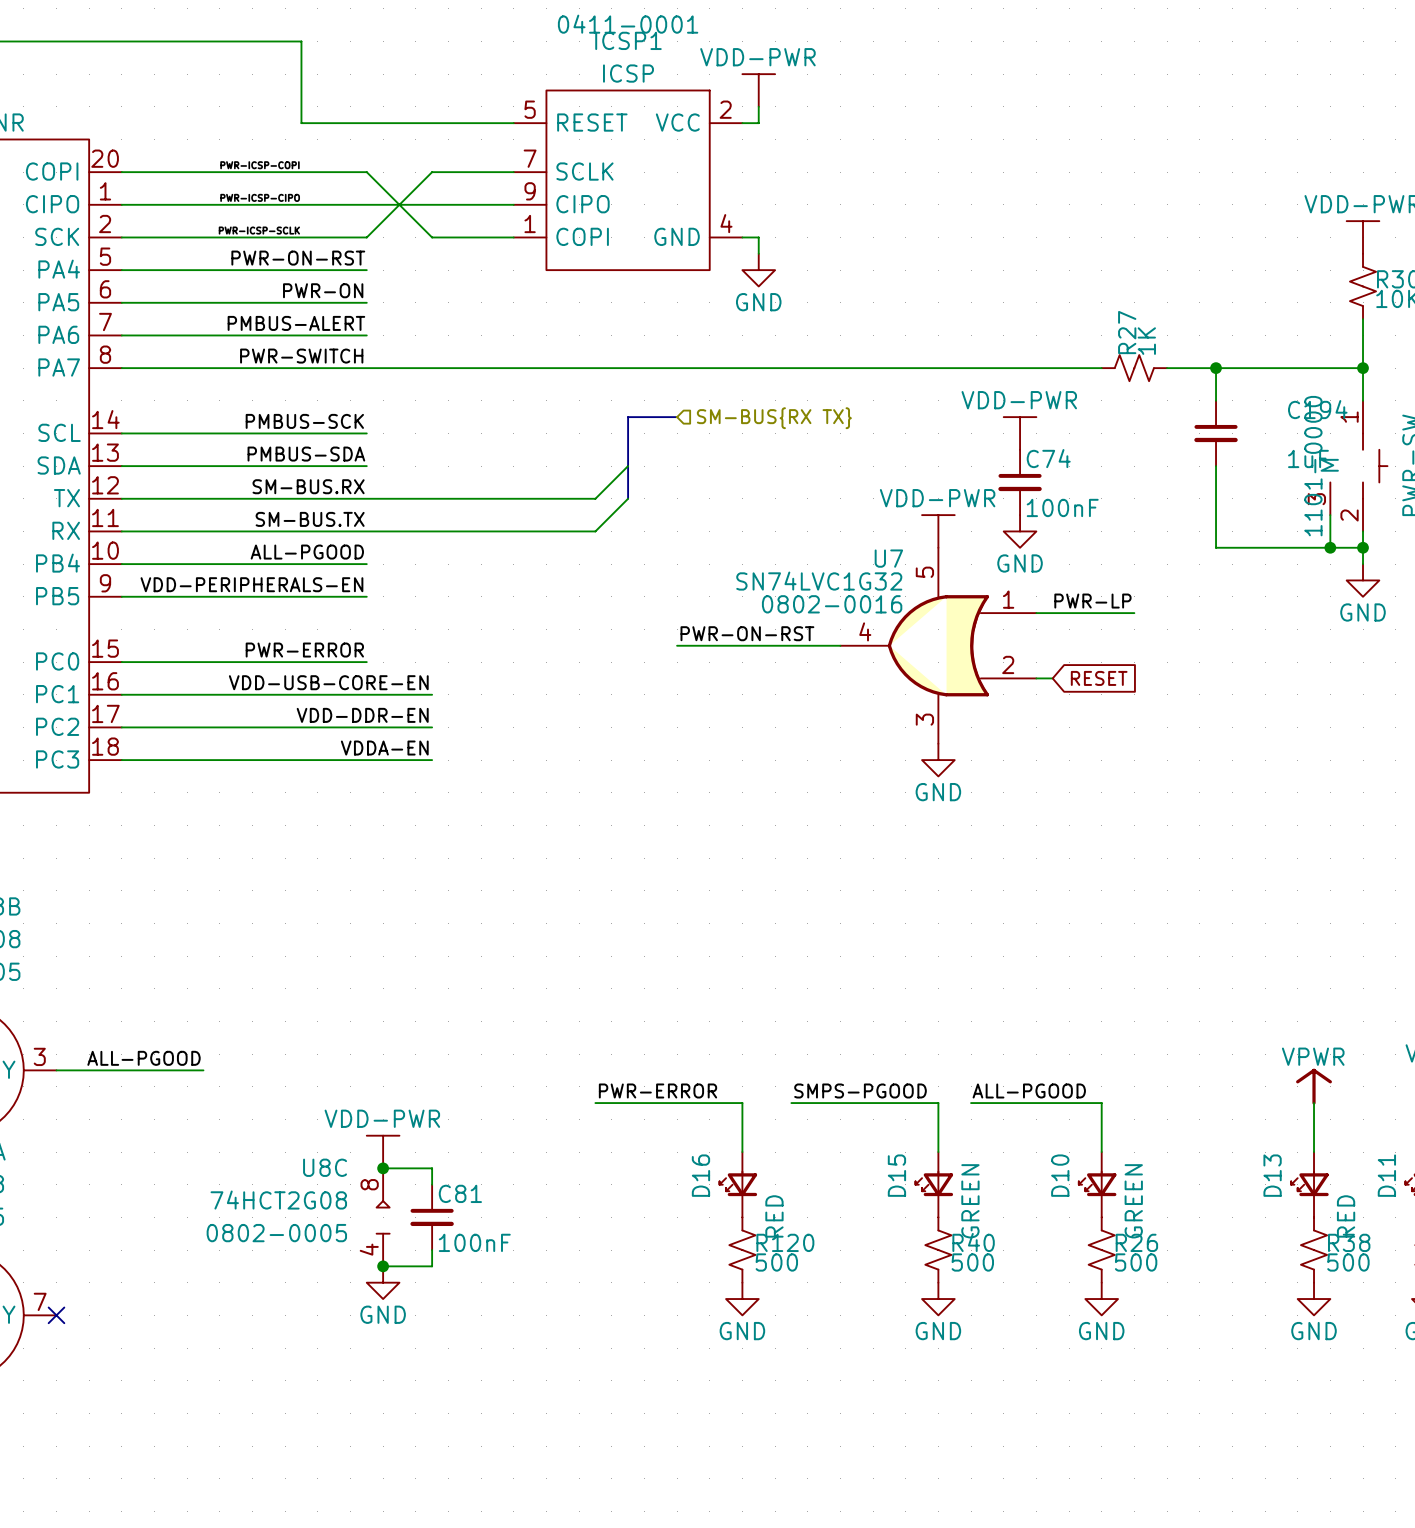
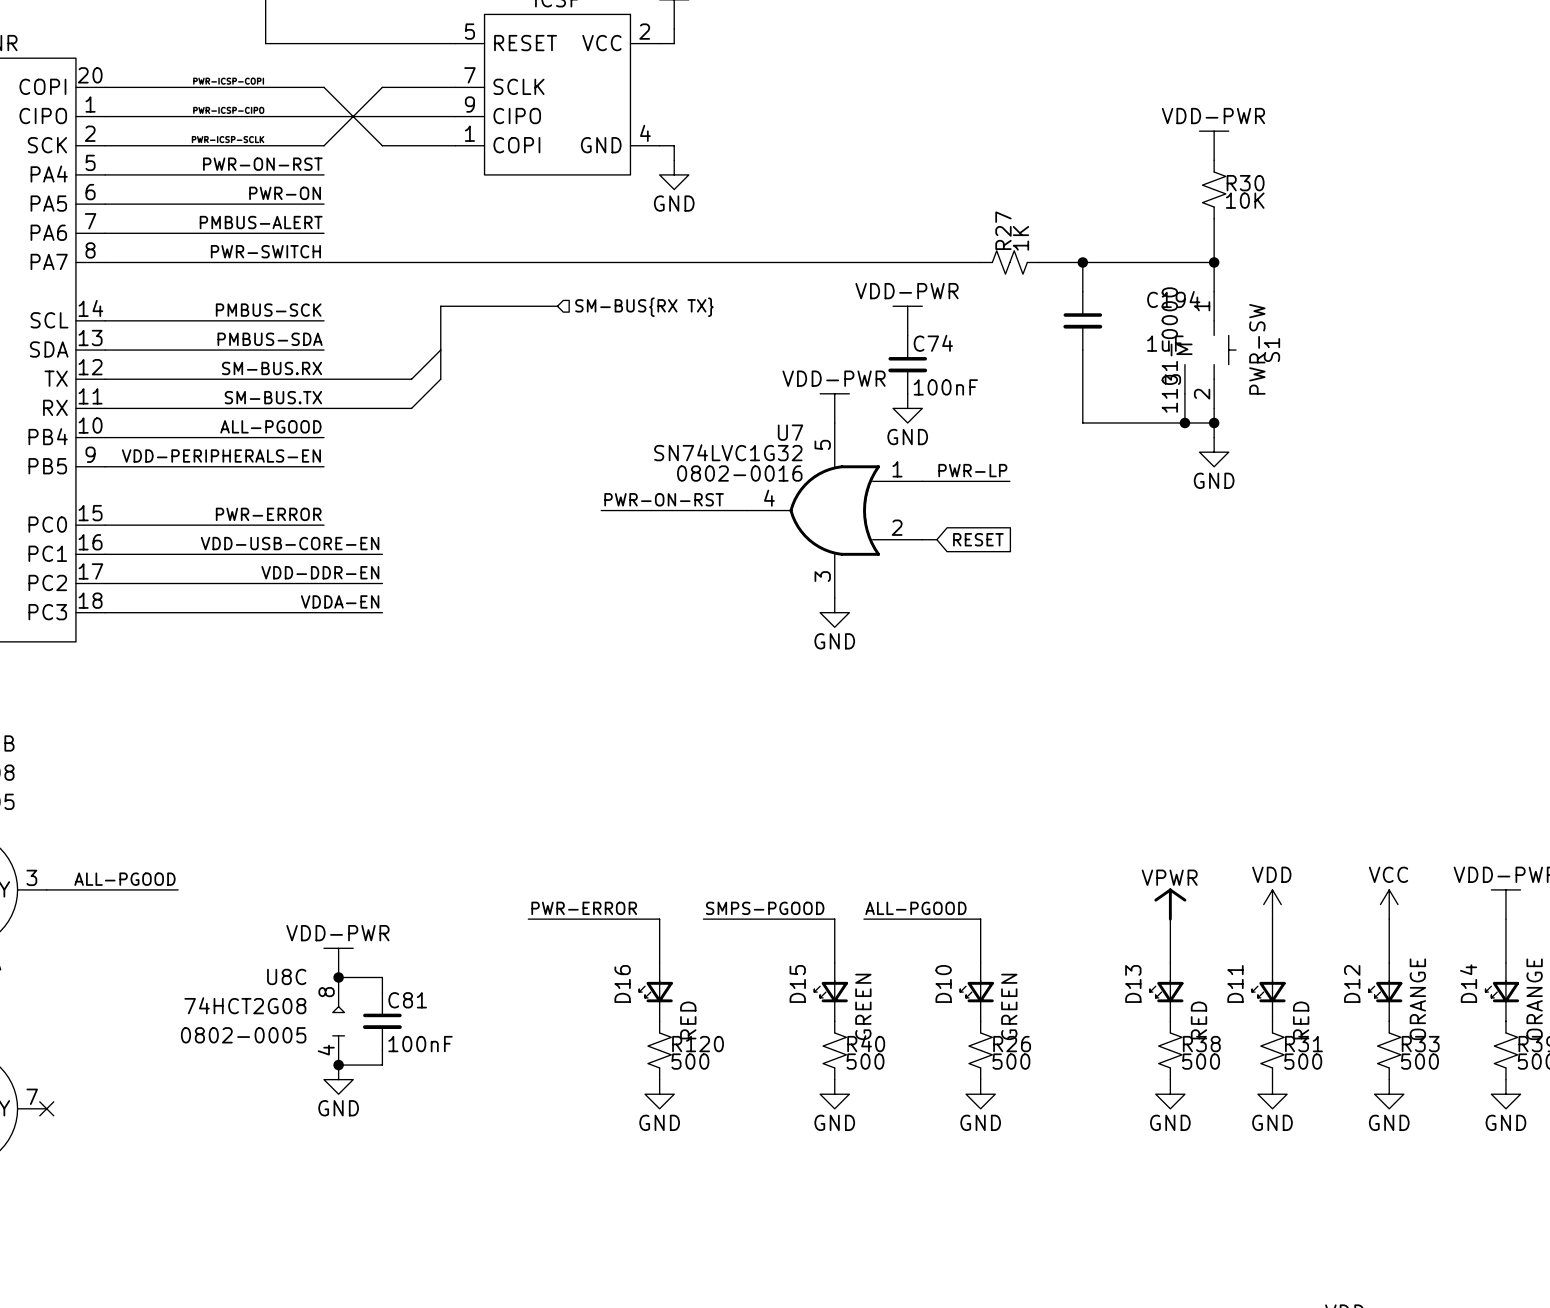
bus: none -> (557, 306) (440, 306) (440, 379)
bus: (677, 417) (628, 417) (628, 498) -> none
hierarchical label position: SM-BUS{RX TX} (774, 418) -> SM-BUS{RX TX} (644, 307)
wire: (628, 466) (595, 498) (464, 498) -> (440, 350) (411, 379)
wire: (628, 498) (595, 531) (464, 531) -> (440, 379) (411, 408)

